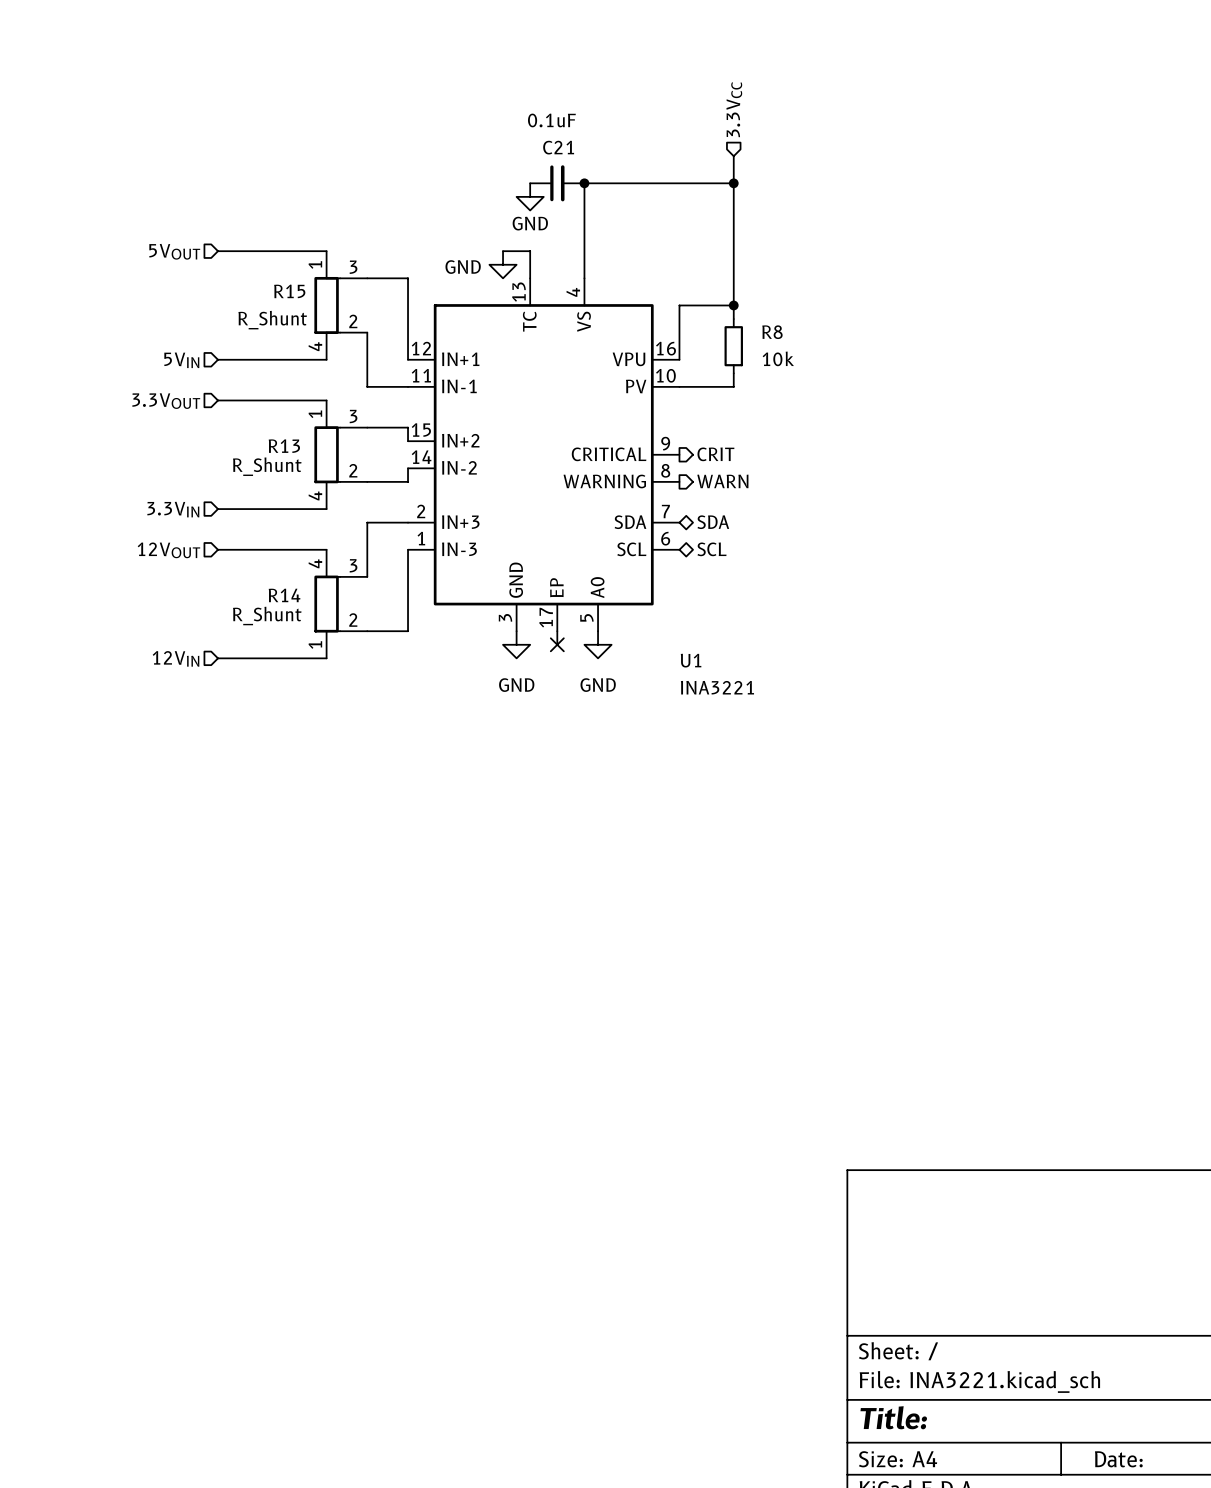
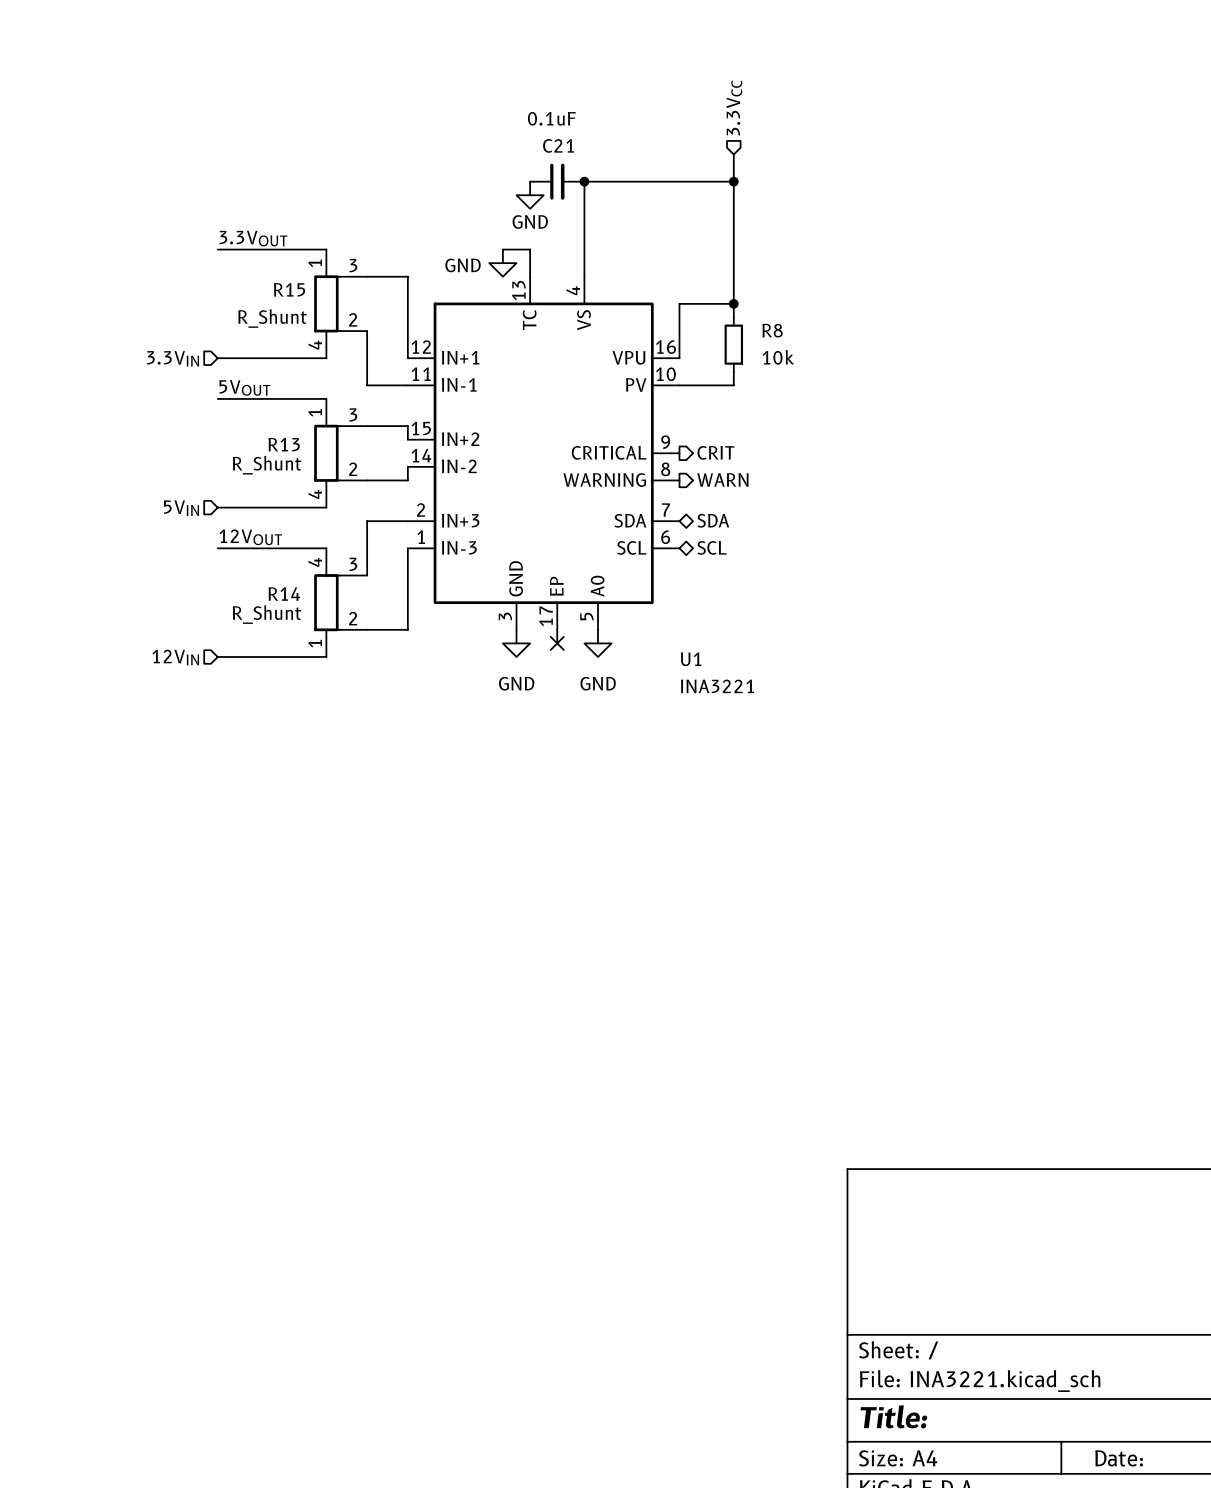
label: none -> 3.3VOUT (253, 238)
hierarchical label: 5VOUT (174, 251) -> none
hierarchical label: 5VIN (181, 360) -> 3.3VIN (173, 358)
label: none -> 5VOUT (244, 387)
hierarchical label: 3.3VOUT (166, 401) -> none
hierarchical label: 3.3VIN (173, 509) -> 5VIN (181, 508)
label: none -> 12VOUT (250, 537)
hierarchical label: 12VOUT (168, 550) -> none

